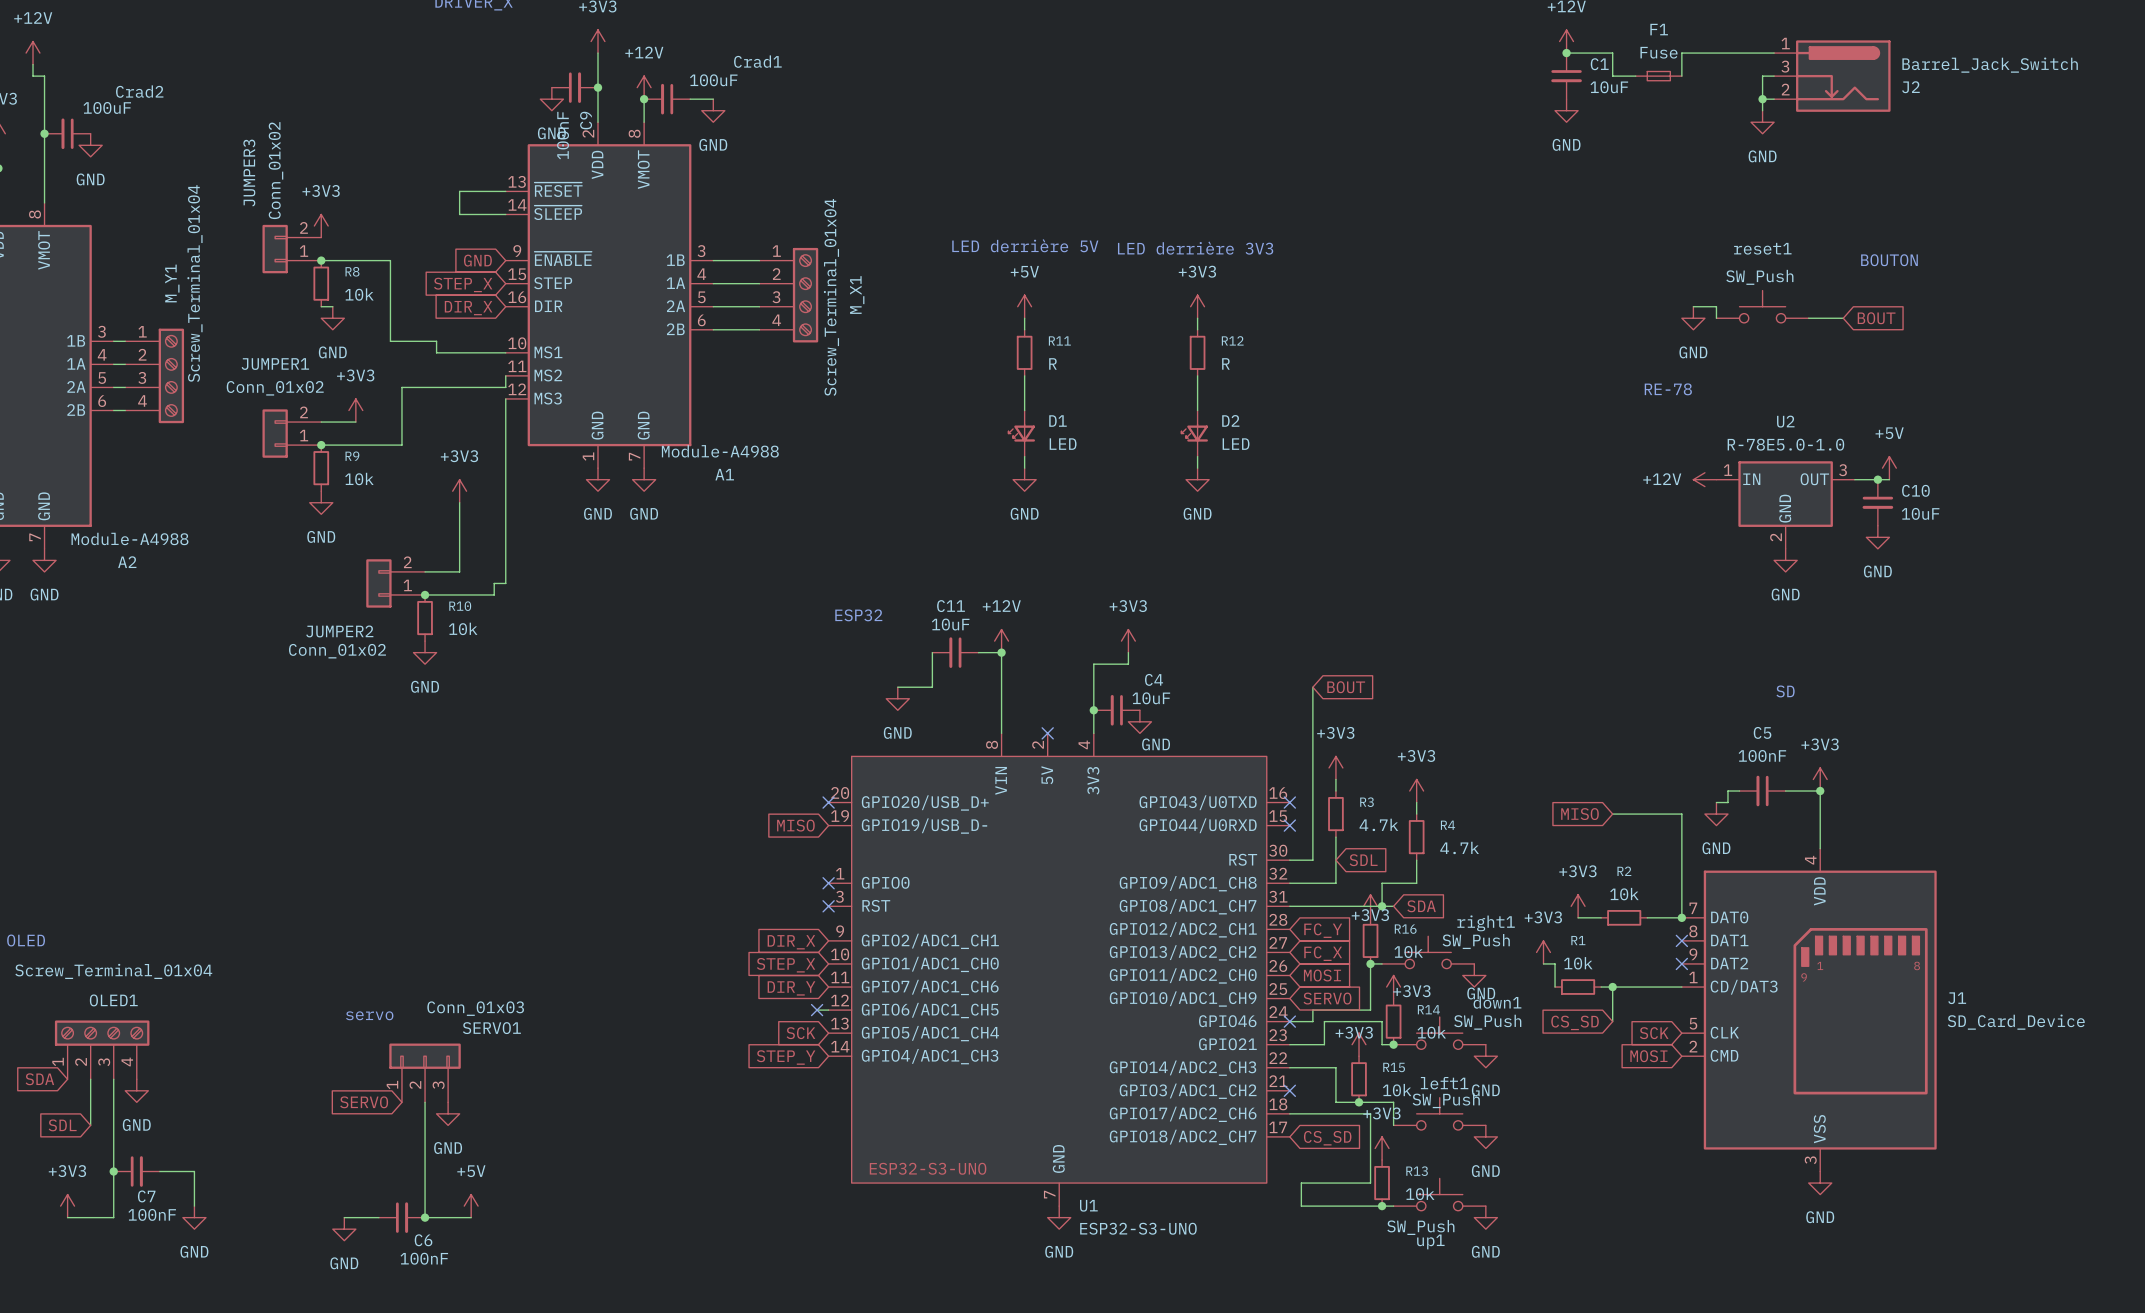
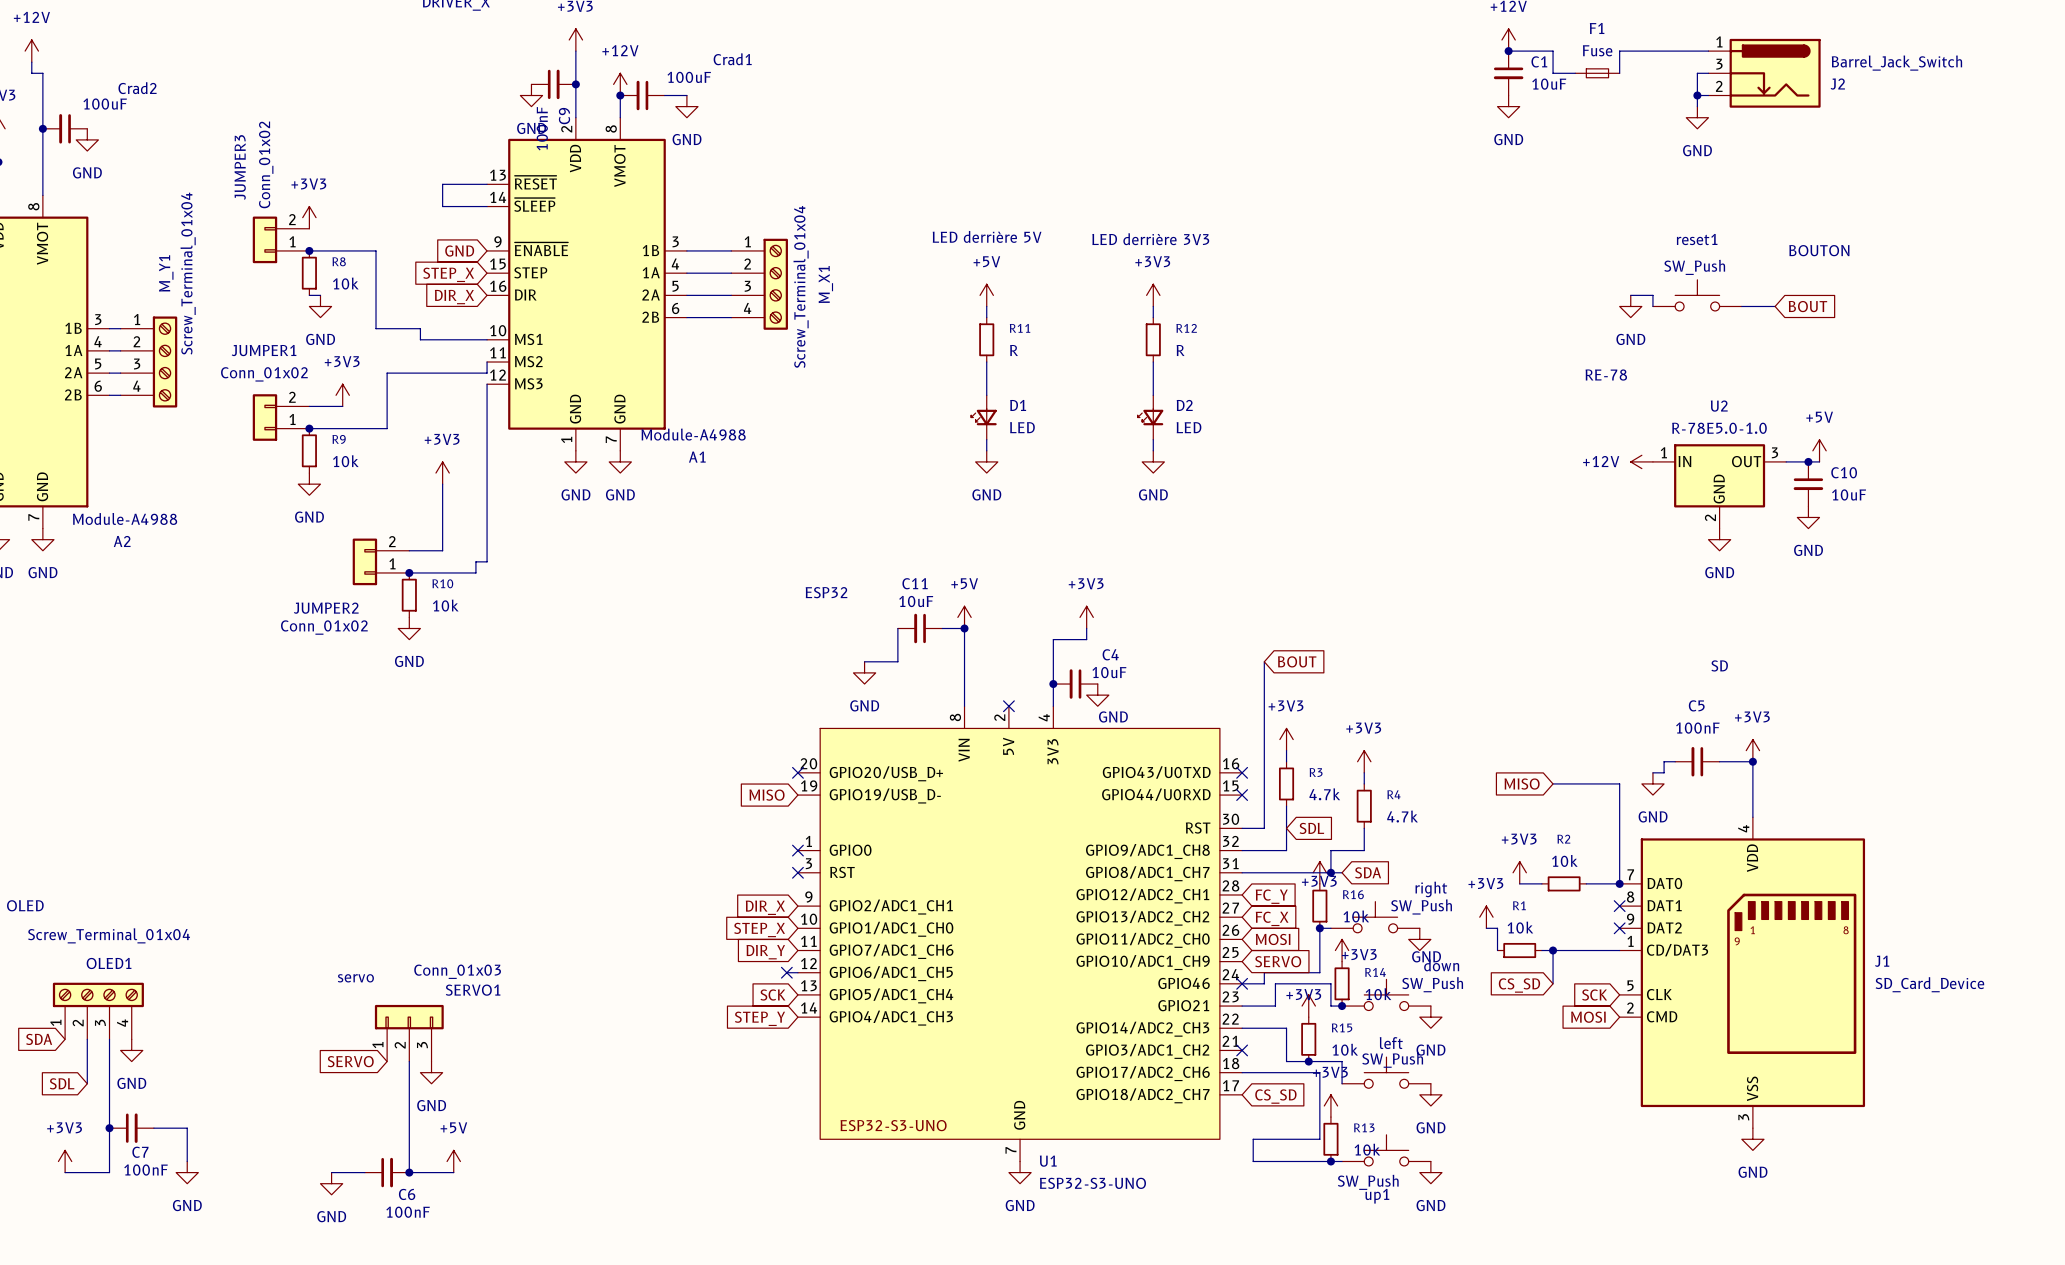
power symbol: +12V (1001, 641) -> +5V (964, 617)
right1 name: right1 (1486, 923) -> right (1431, 889)
down1 name: down1 (1497, 1002) -> down (1441, 965)
left1 name: left1 (1444, 1083) -> left (1391, 1043)

